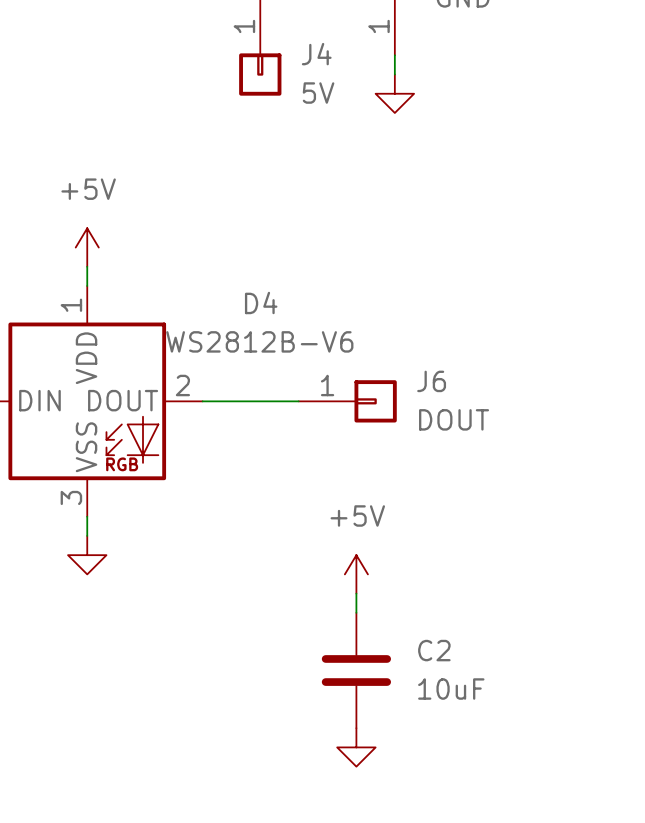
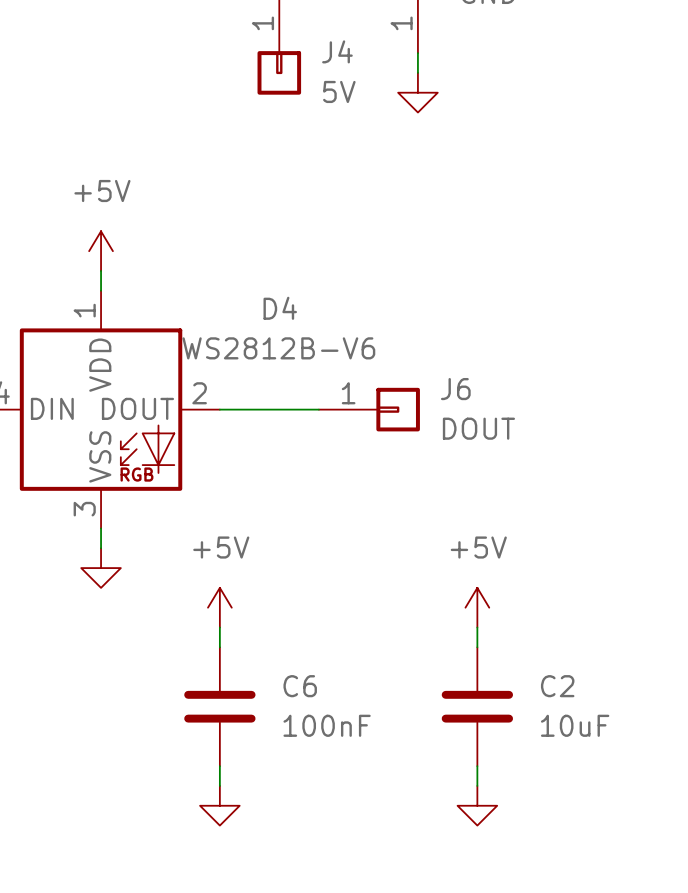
power symbol: +5V (356, 574) -> none
power symbol: none -> +5V (219, 607)
wire: (356, 593) (356, 612) -> (477, 627) (477, 647)
power symbol: none -> +5V (477, 607)
wire: none -> (219, 627) (219, 647)
C2 position: (356, 670) -> (477, 706)
C6: none -> 100nF (219, 706)
wire: none -> (219, 766) (219, 785)
power symbol: (356, 747) -> none
wire: none -> (477, 766) (477, 785)
power symbol: none -> (219, 805)
power symbol: none -> (477, 805)

